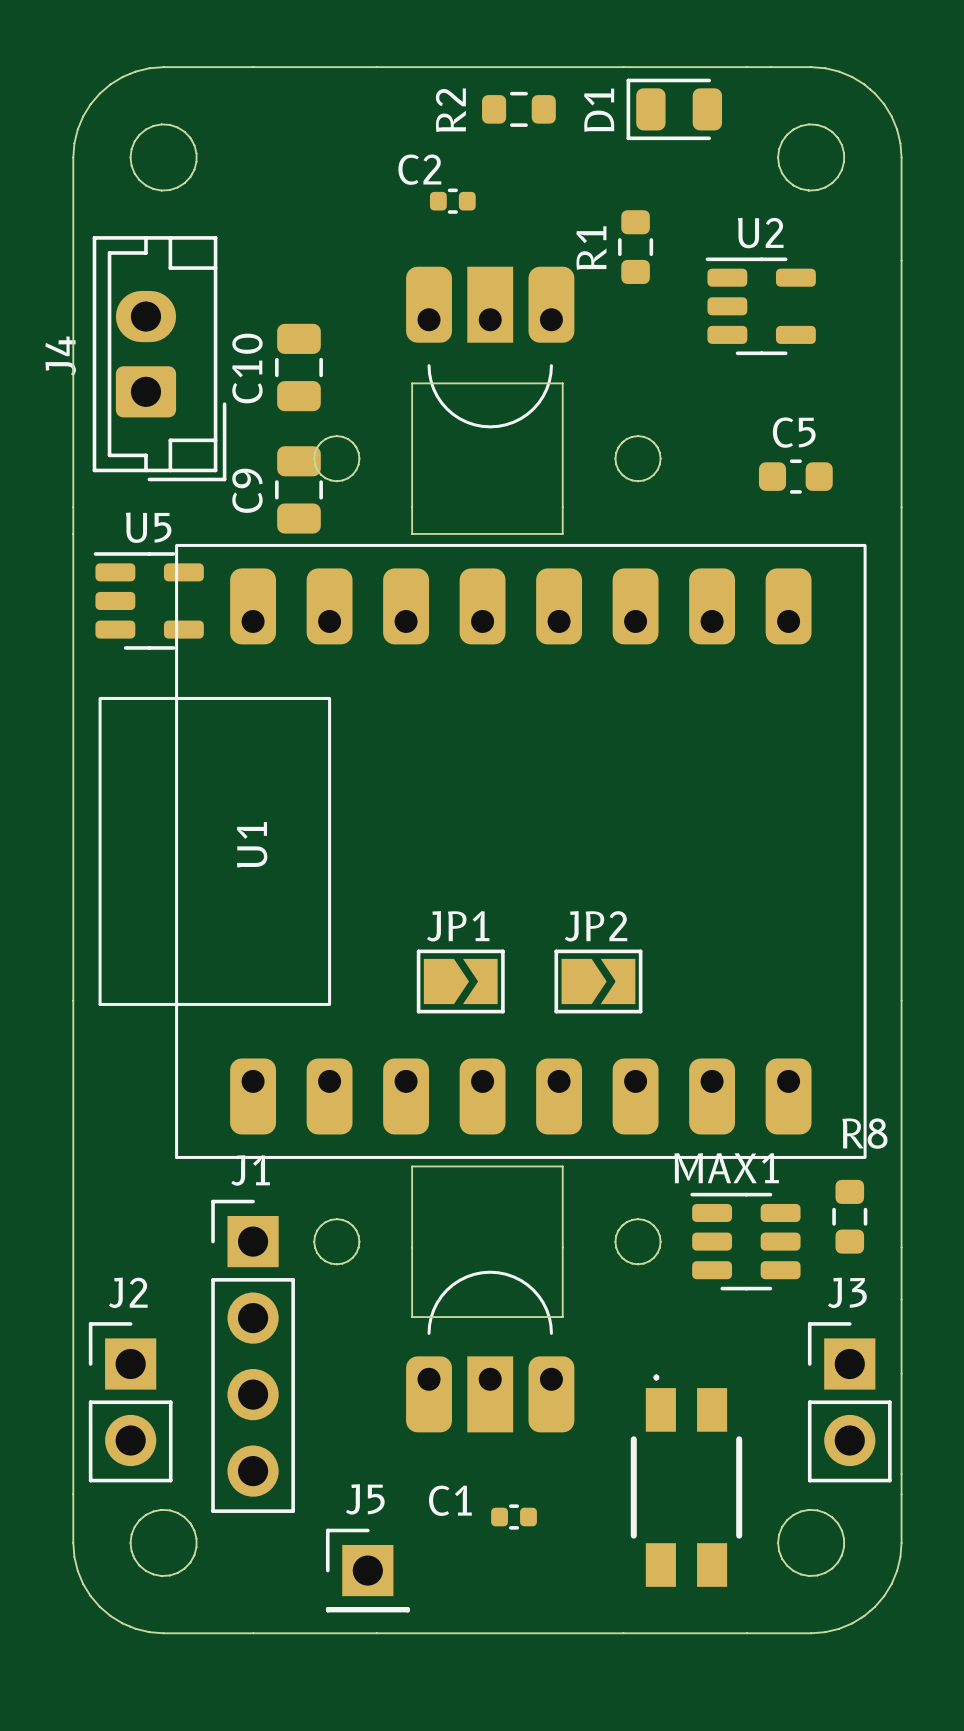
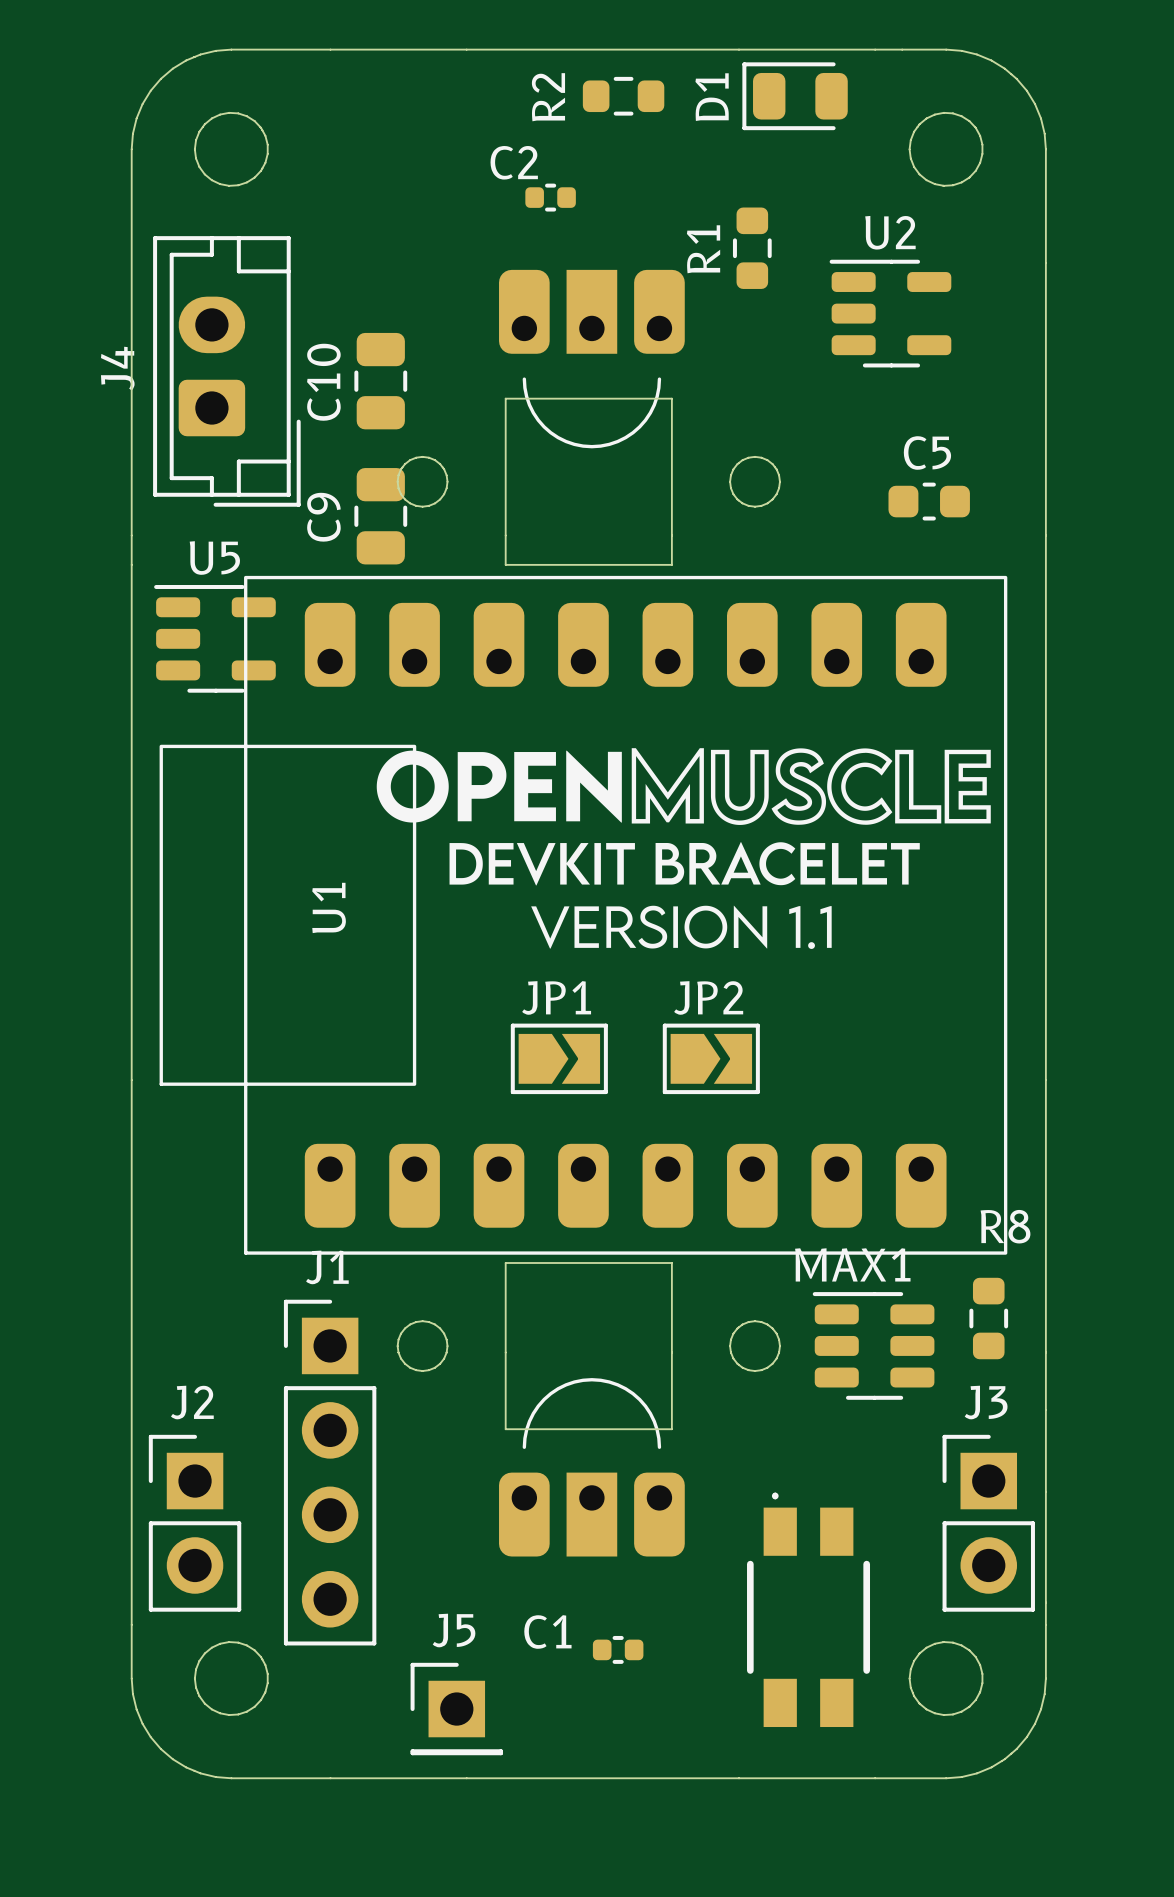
drawing: none -> [376, 748, 991, 949]

